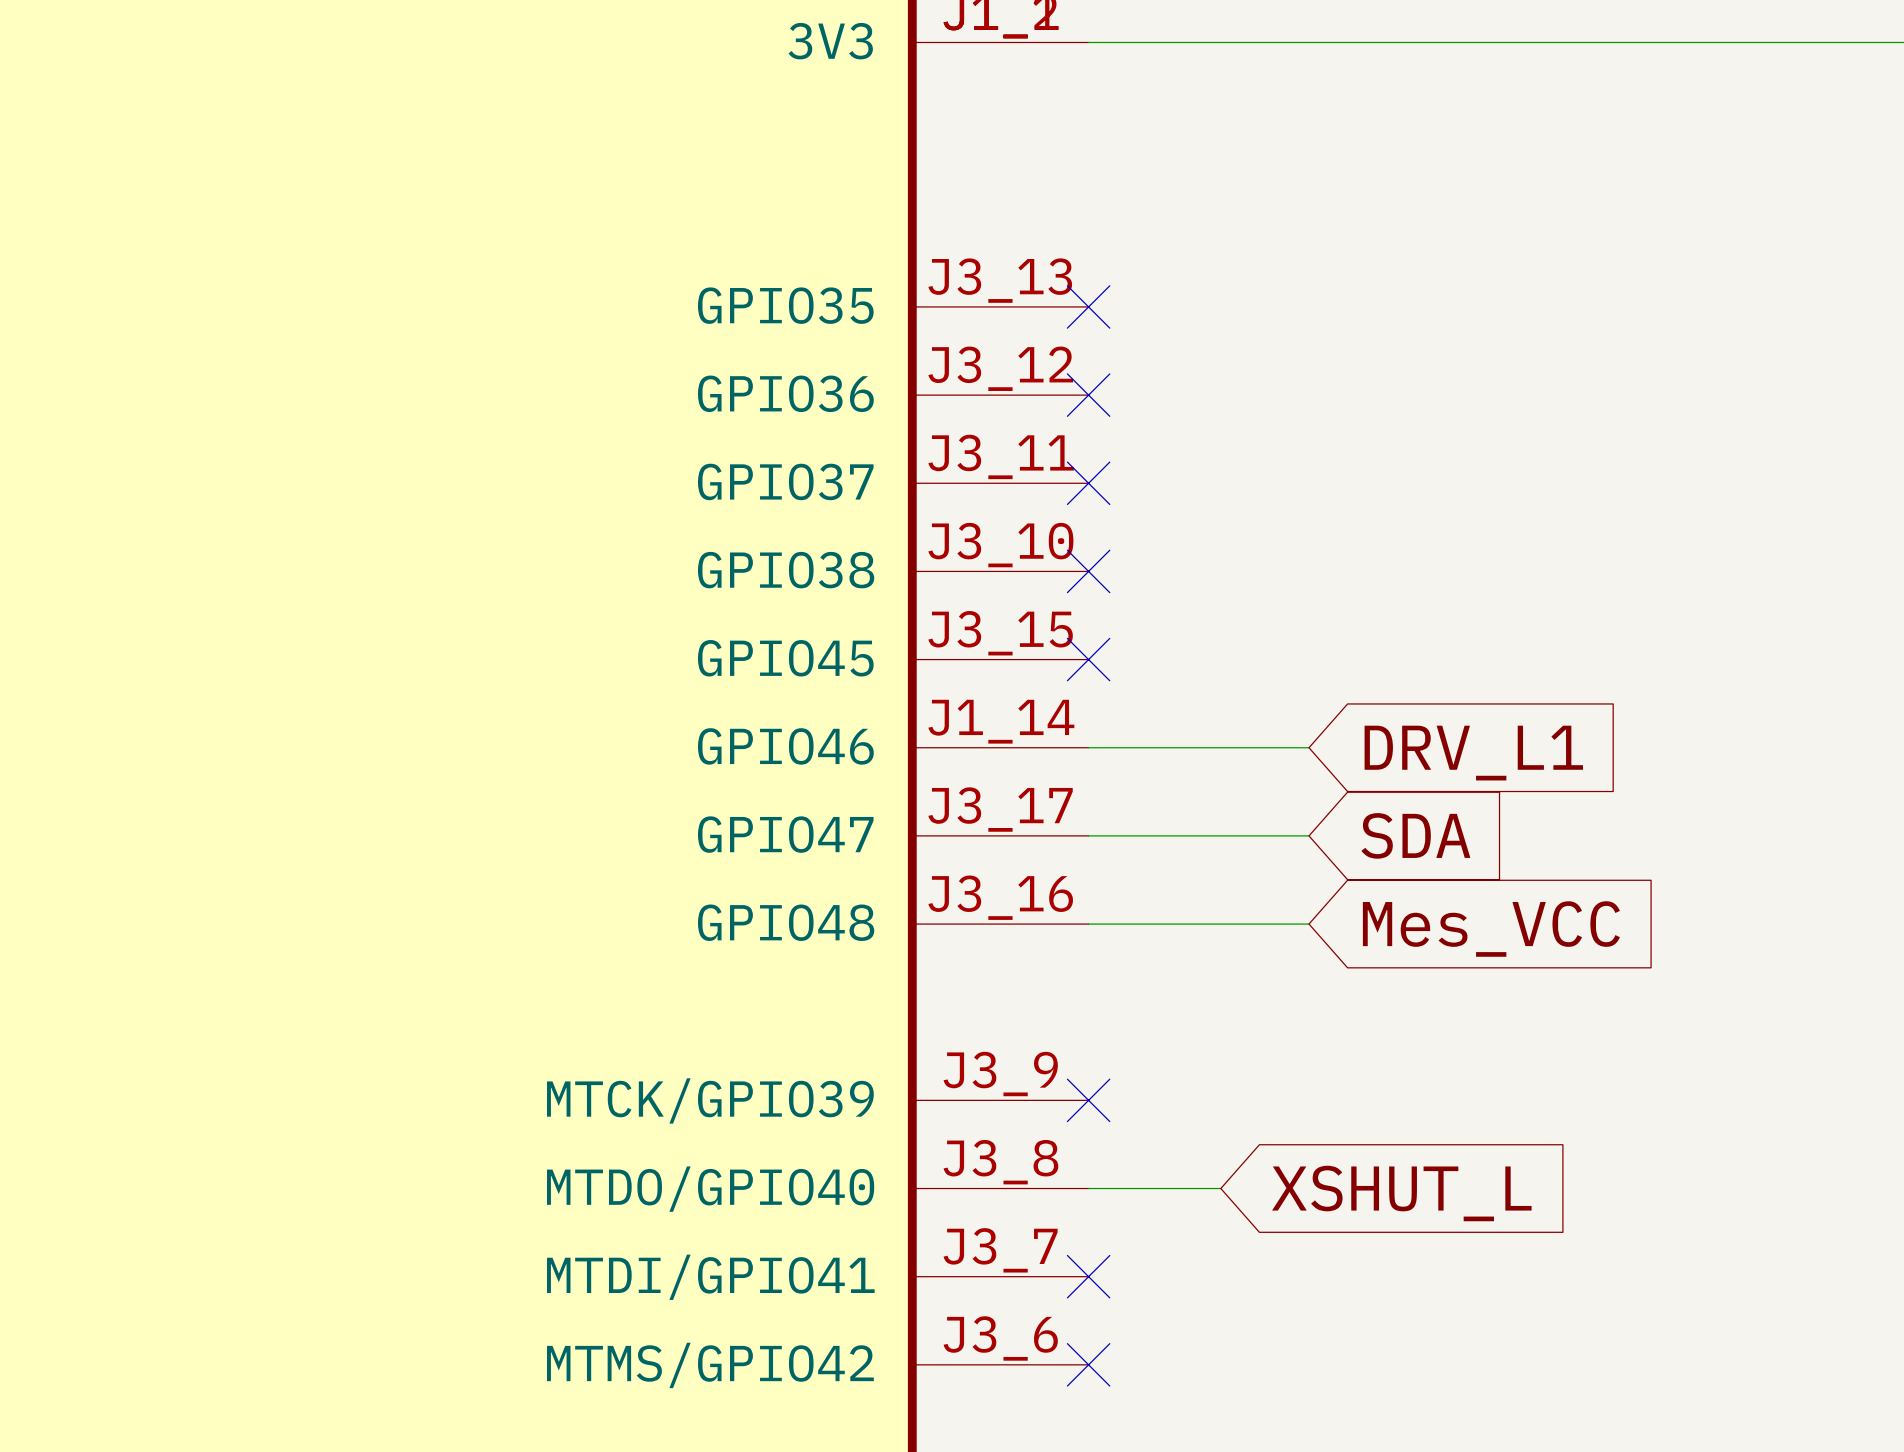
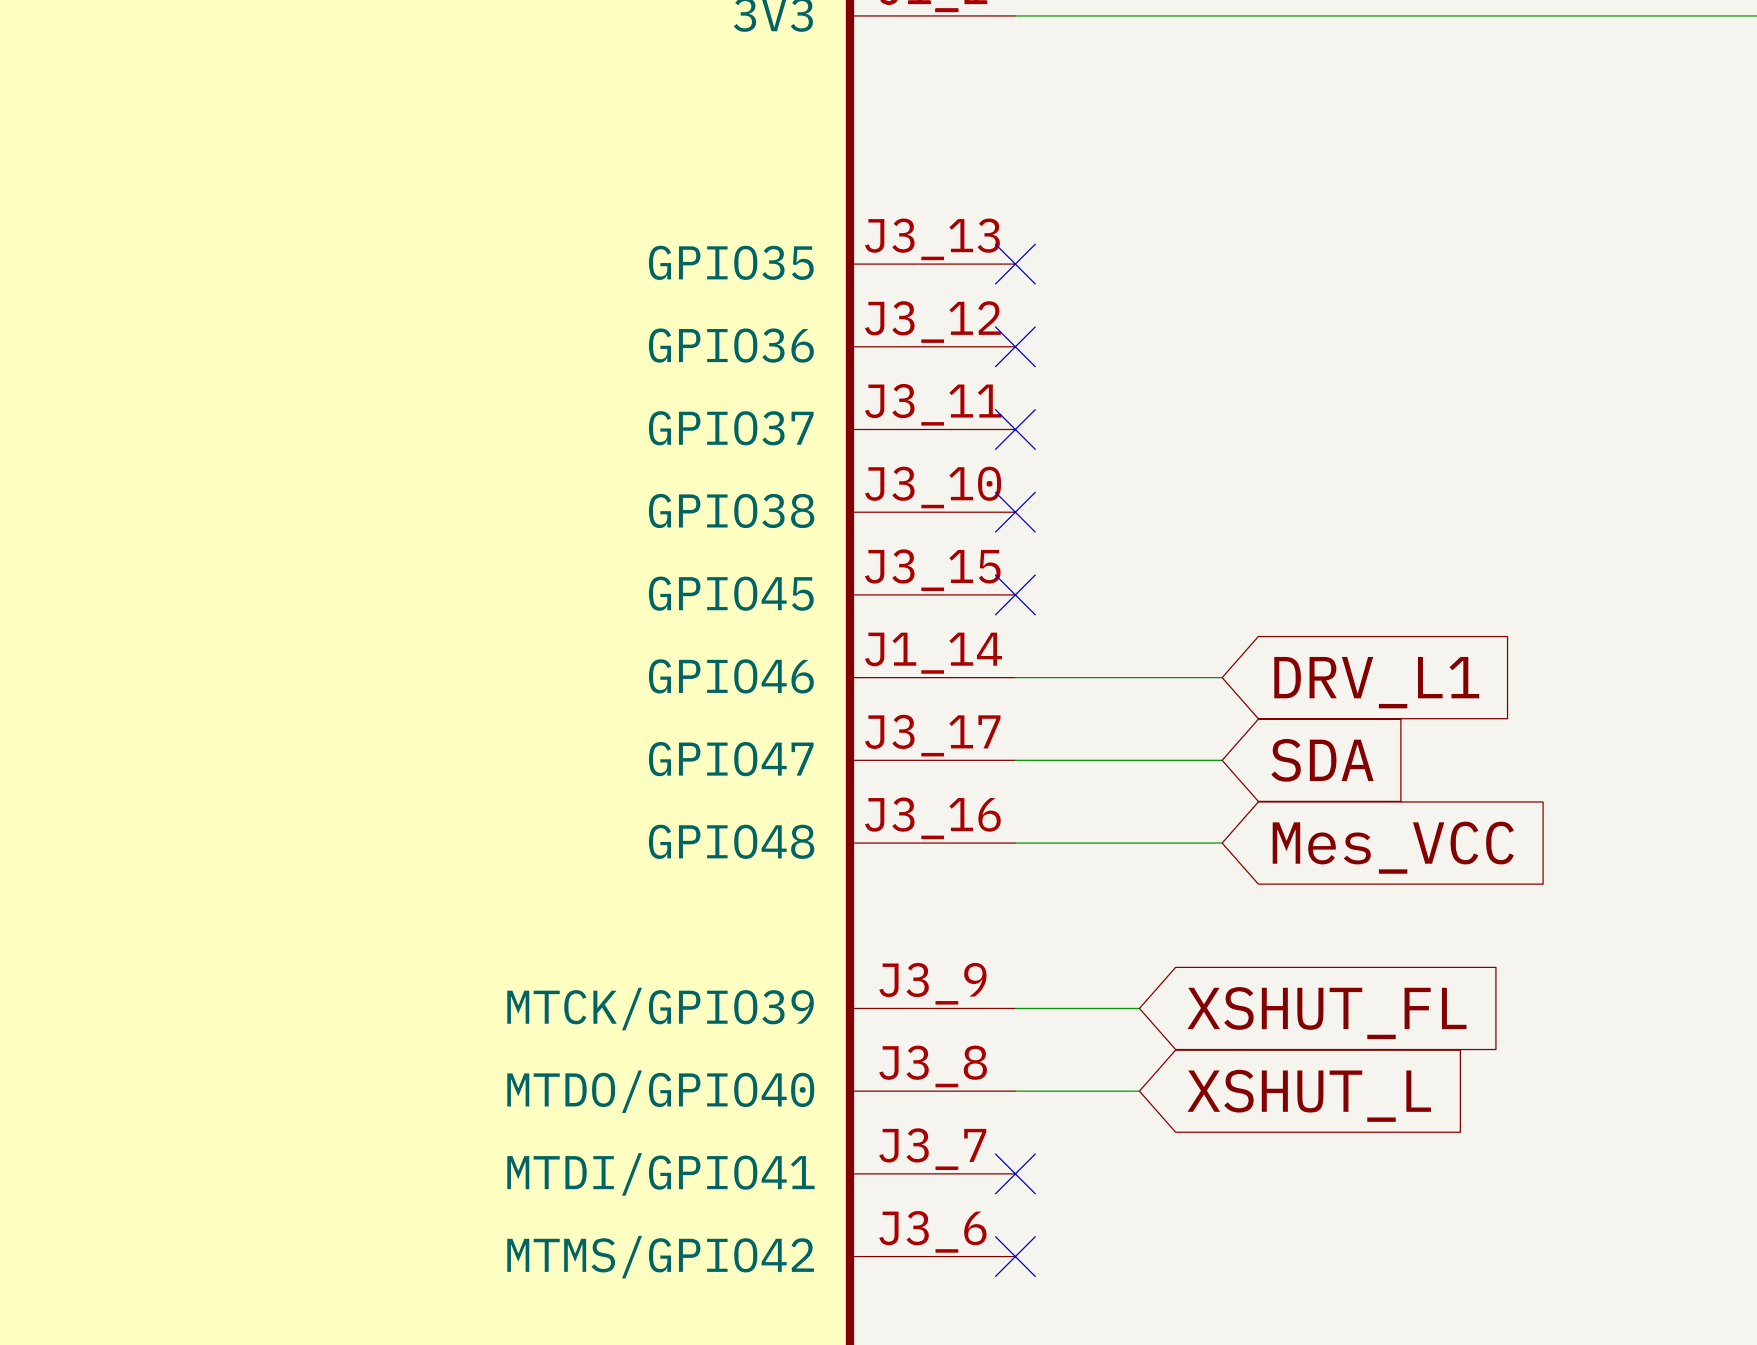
wire: none -> (1015, 1008) (1139, 1008)
no-connect mark: (1088, 1100) -> none
global label: none -> XSHUT_FL (1327, 1013)

